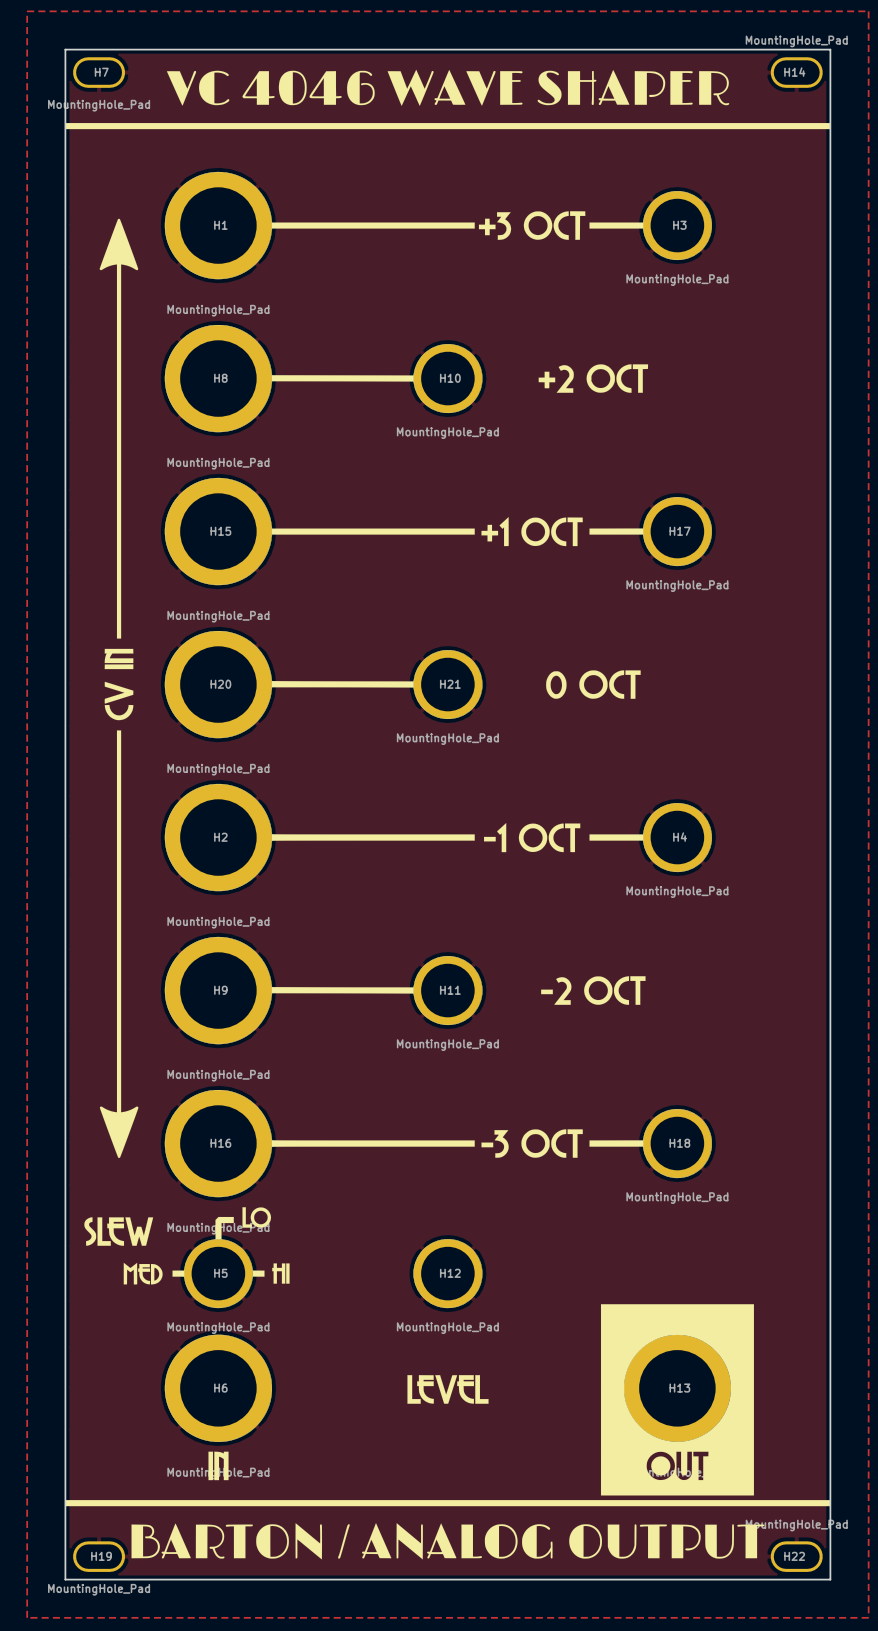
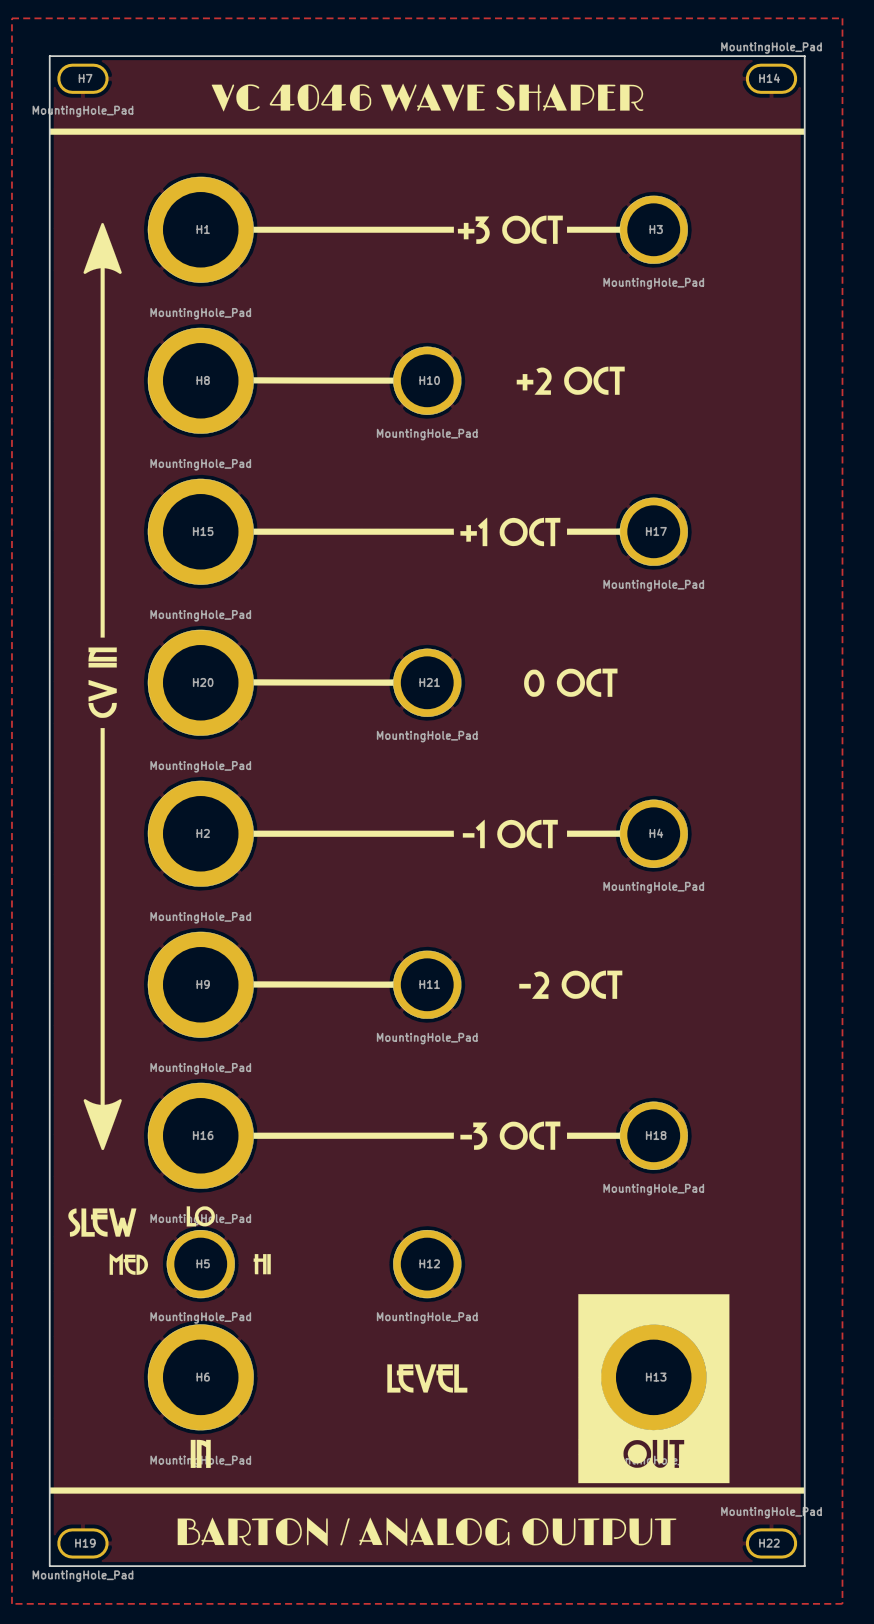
drawing shape: [65, 69, 831, 1560] -> [49, 83, 805, 1547]

